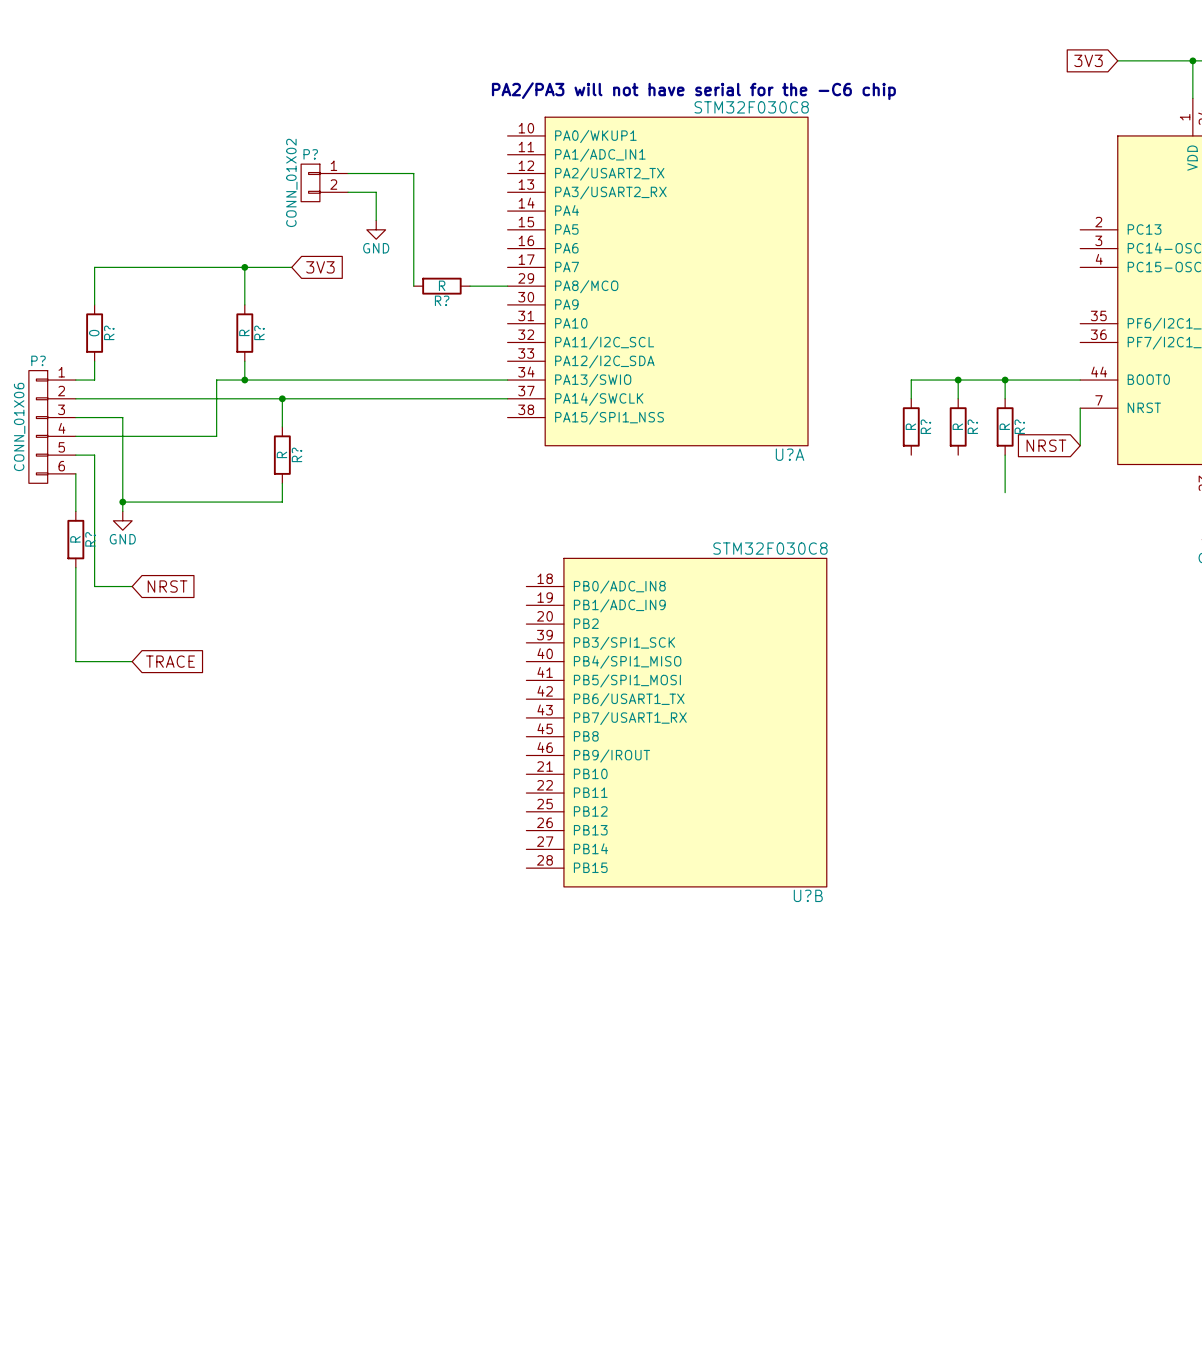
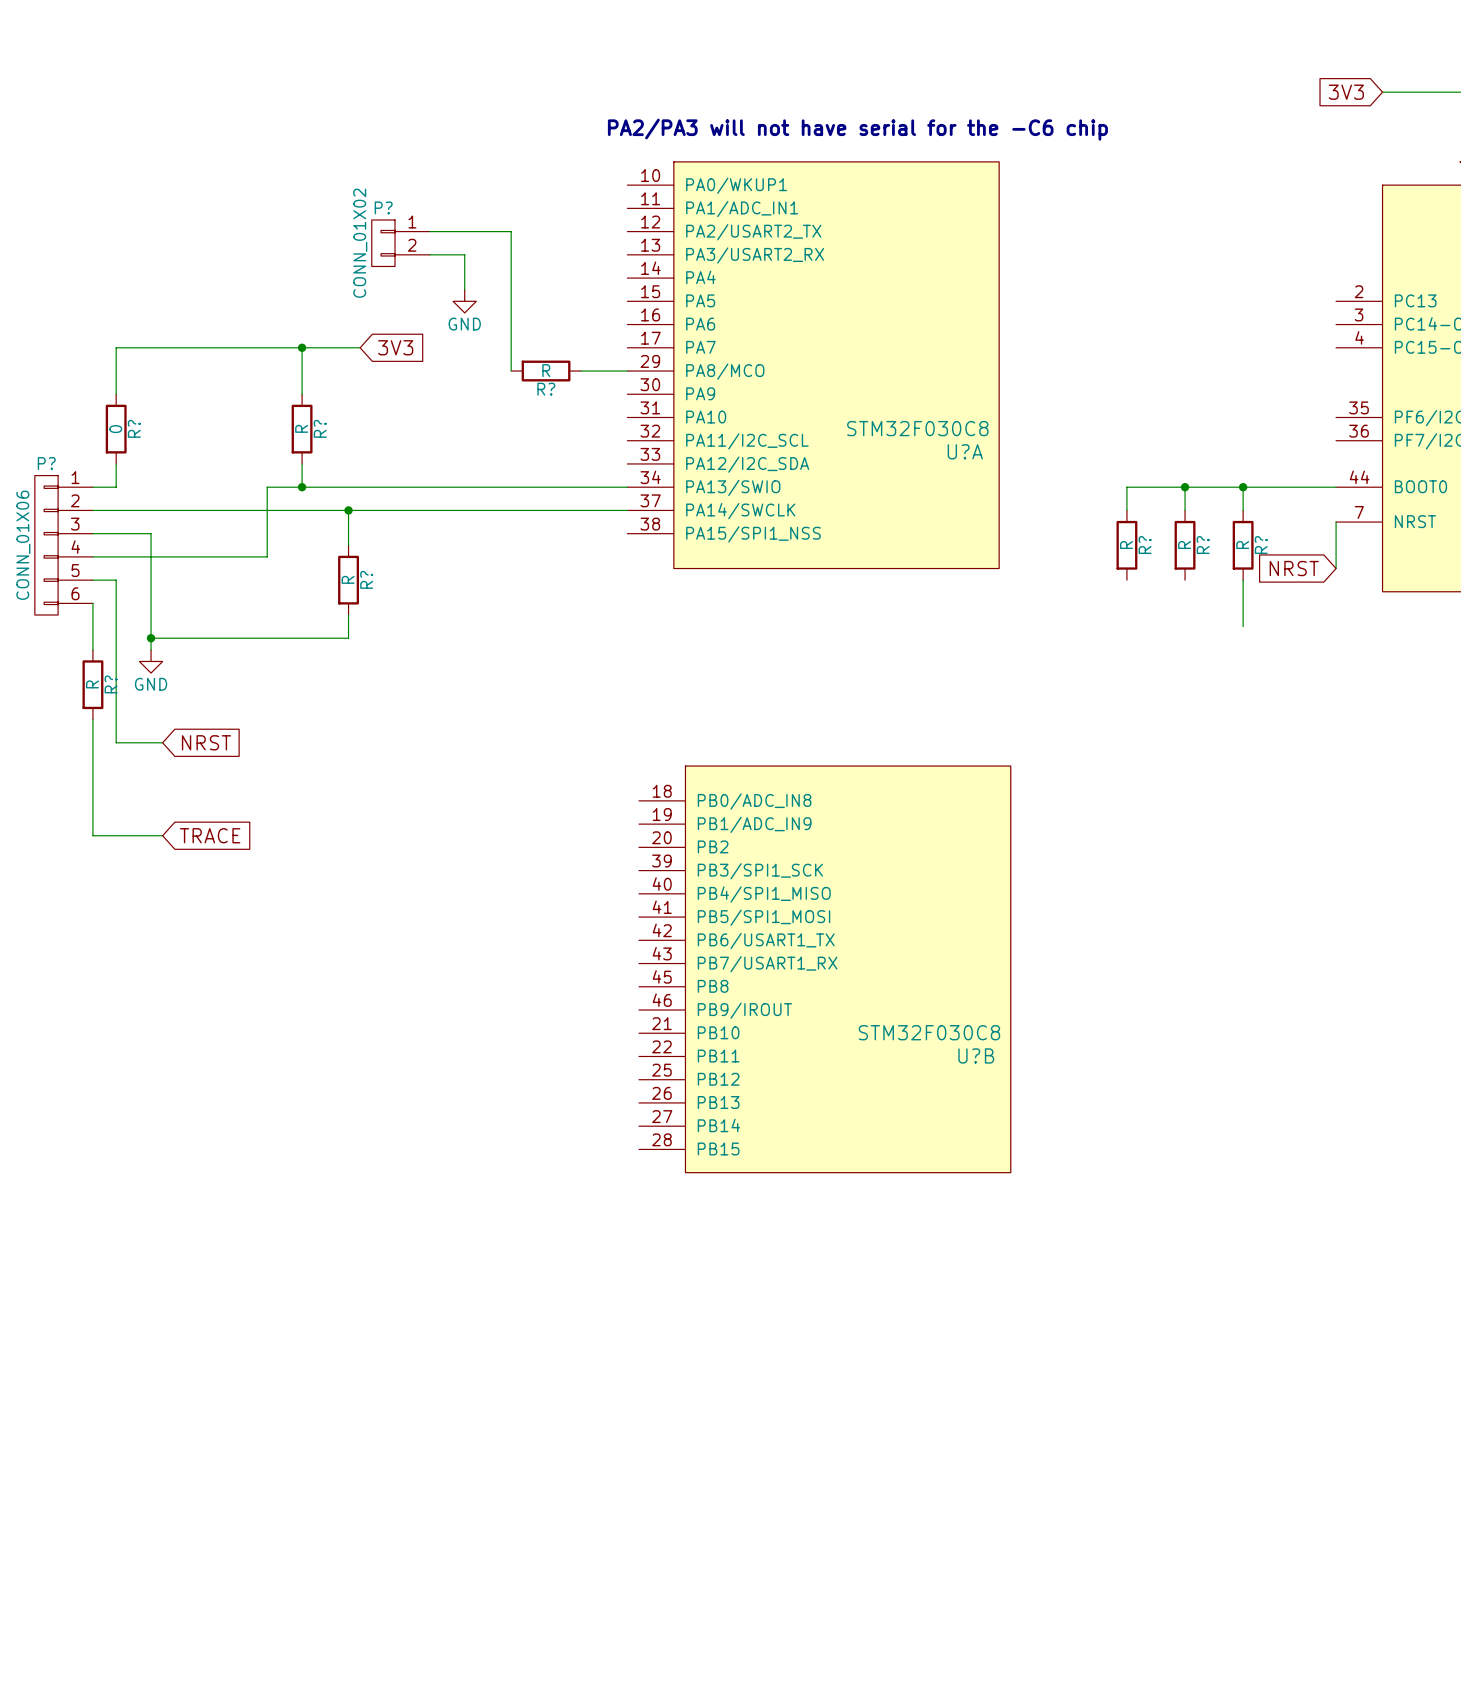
U?A value position: STM32F030C8 (751, 107) -> STM32F030C8 (917, 428)
U?A name position: U?A (790, 454) -> U?A (965, 451)
U?B value position: STM32F030C8 (770, 548) -> STM32F030C8 (929, 1032)
U?B position: (676, 722) -> (824, 969)
U?B name position: U?B (808, 895) -> U?B (976, 1055)

